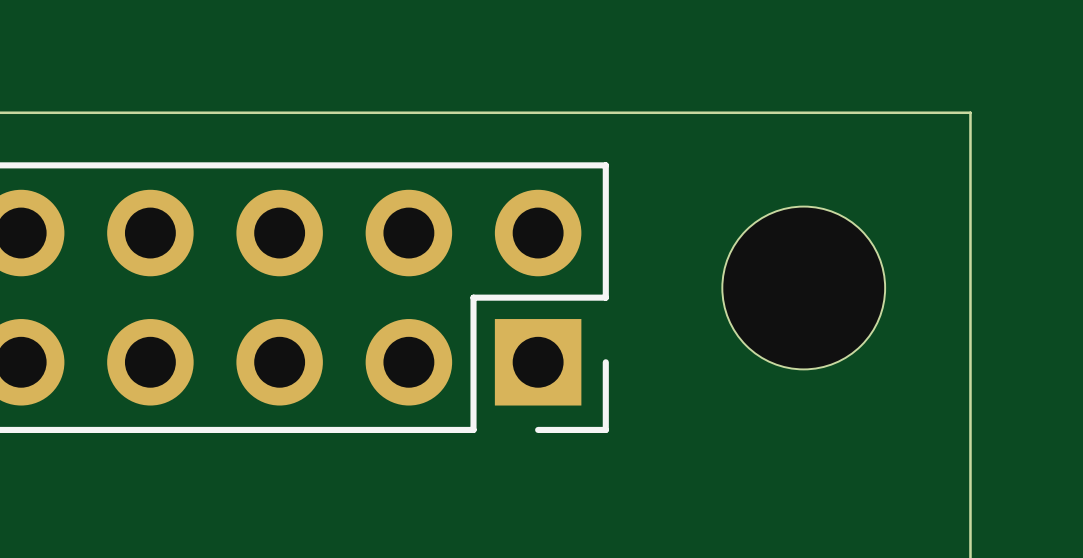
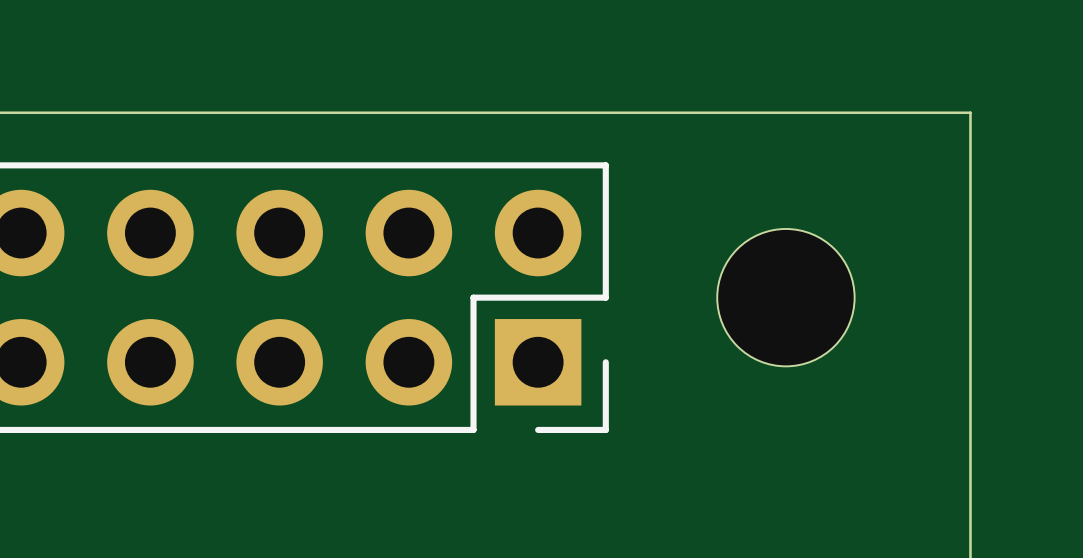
part footprint: [722, 206, 886, 370] -> [717, 228, 855, 367]

